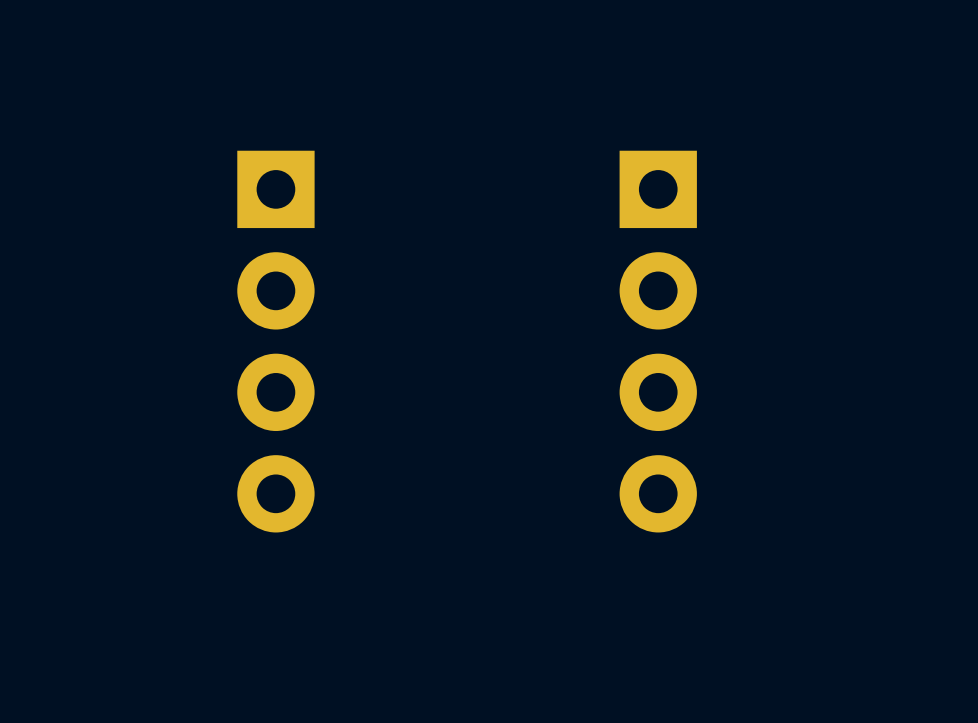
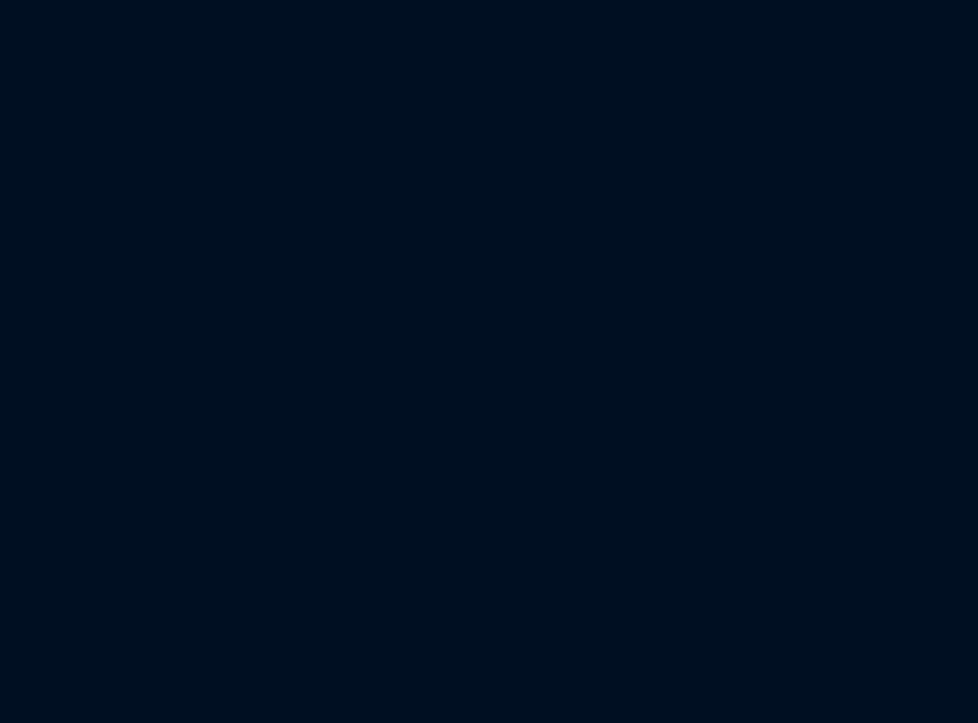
part: (275, 341) -> none
part: (658, 341) -> none

